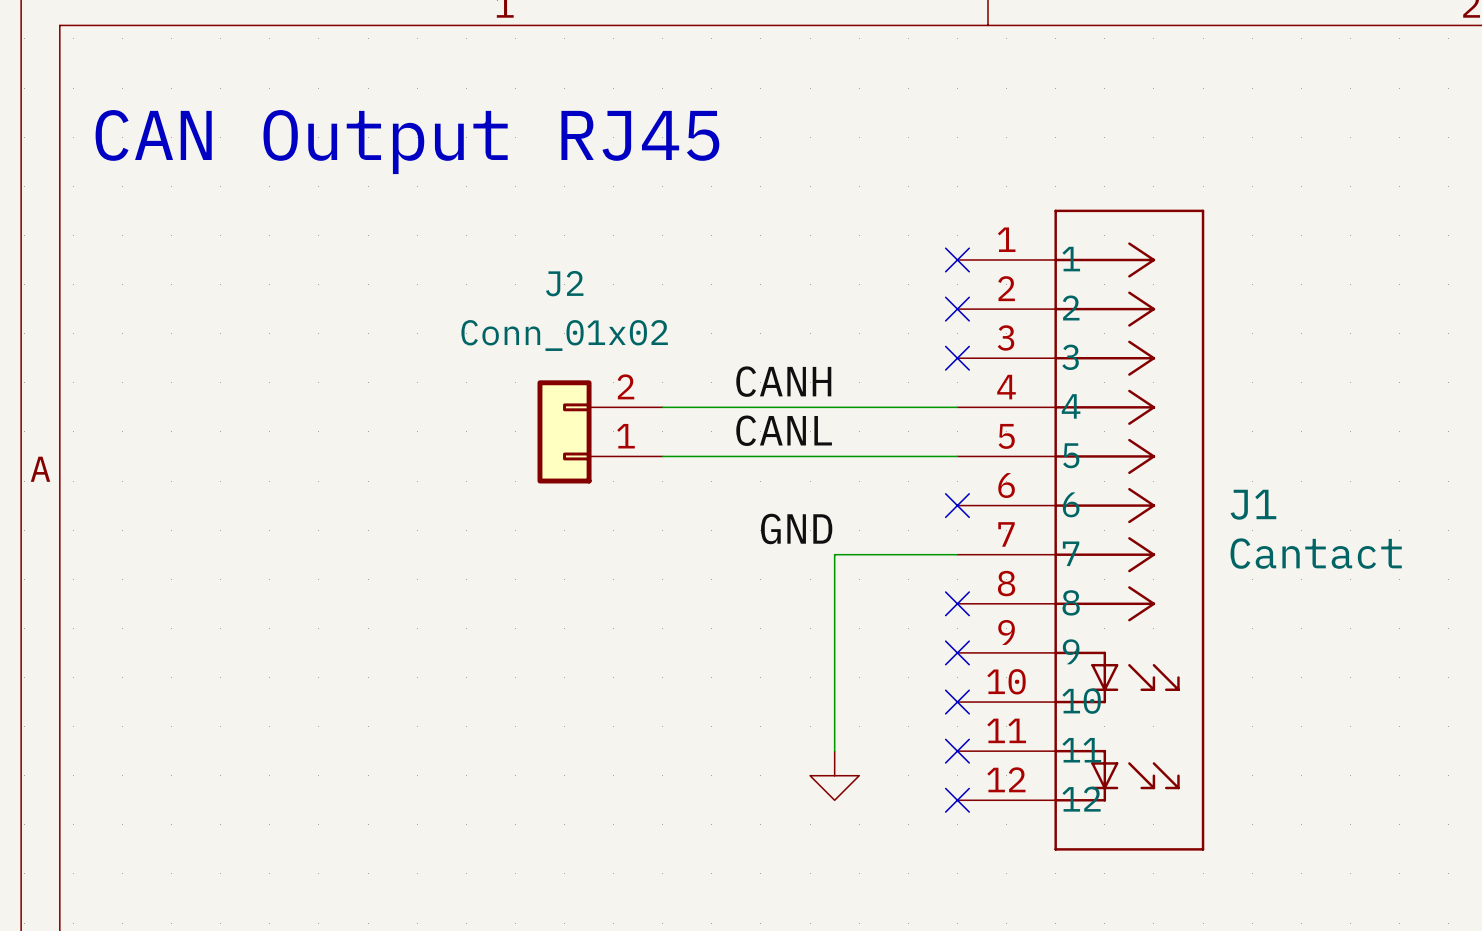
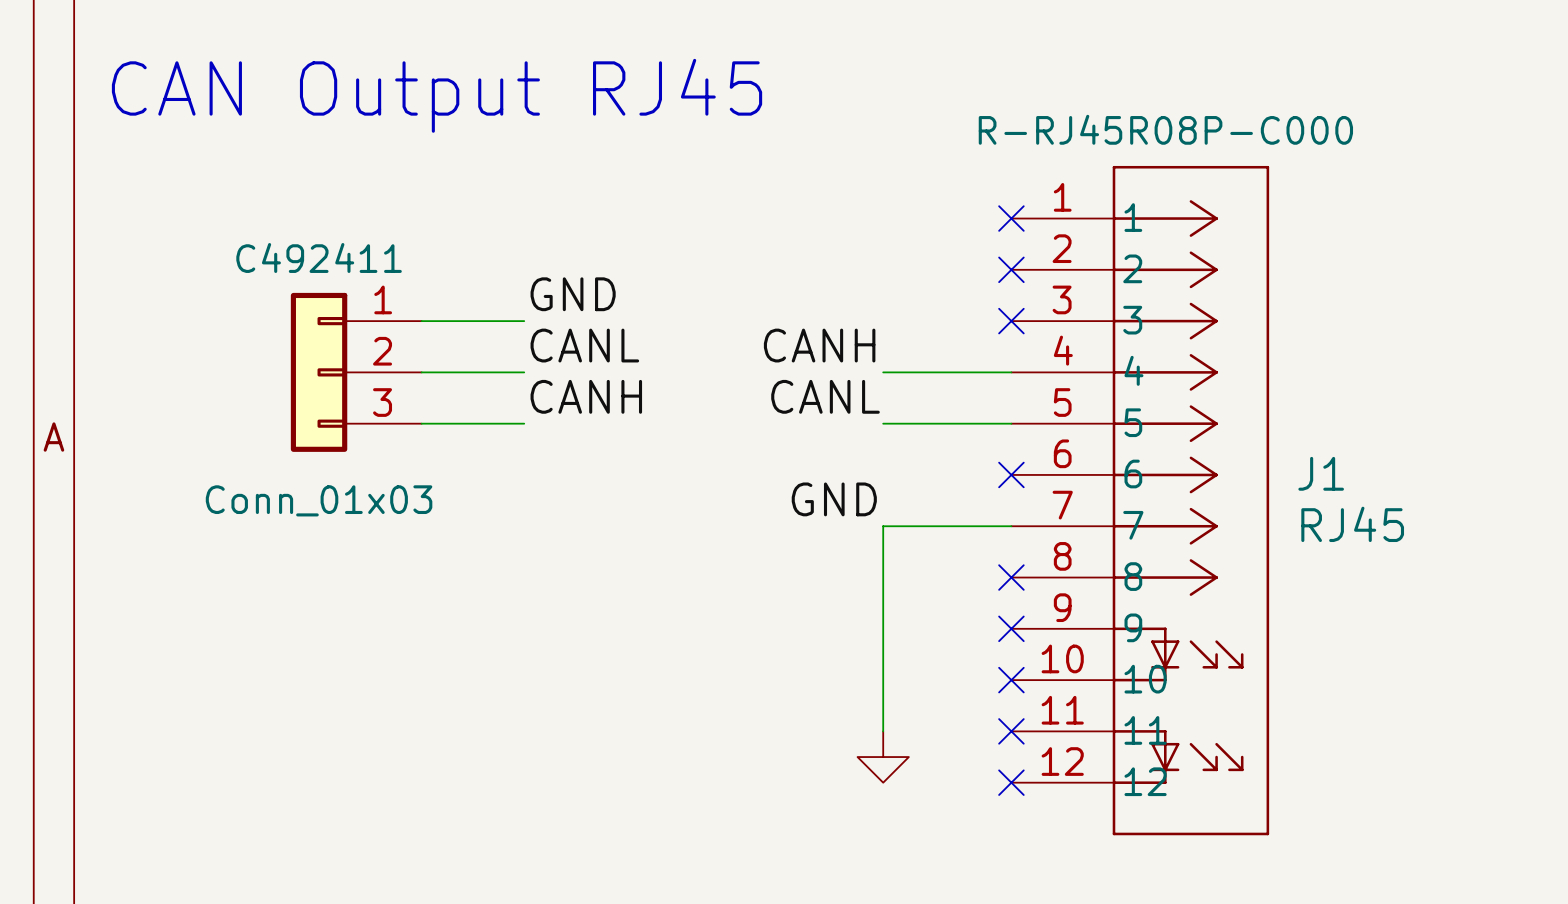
J1 text: none -> R-RJ45R08P-C000 (1165, 129)
label: none -> GND (573, 294)
wire: none -> (421, 321) (524, 321)
label: none -> CANL (584, 345)
part: none -> Conn_01x03 (356, 372)
wire: none -> (421, 372) (524, 372)
wire: (662, 407) (834, 407) -> none
label: none -> CANH (586, 396)
J2: Conn_01x02 (600, 431) -> none
wire: none -> (421, 423) (524, 423)
wire: (662, 456) (834, 456) -> none
J1 value: Cantact (1316, 553) -> RJ45 (1352, 524)

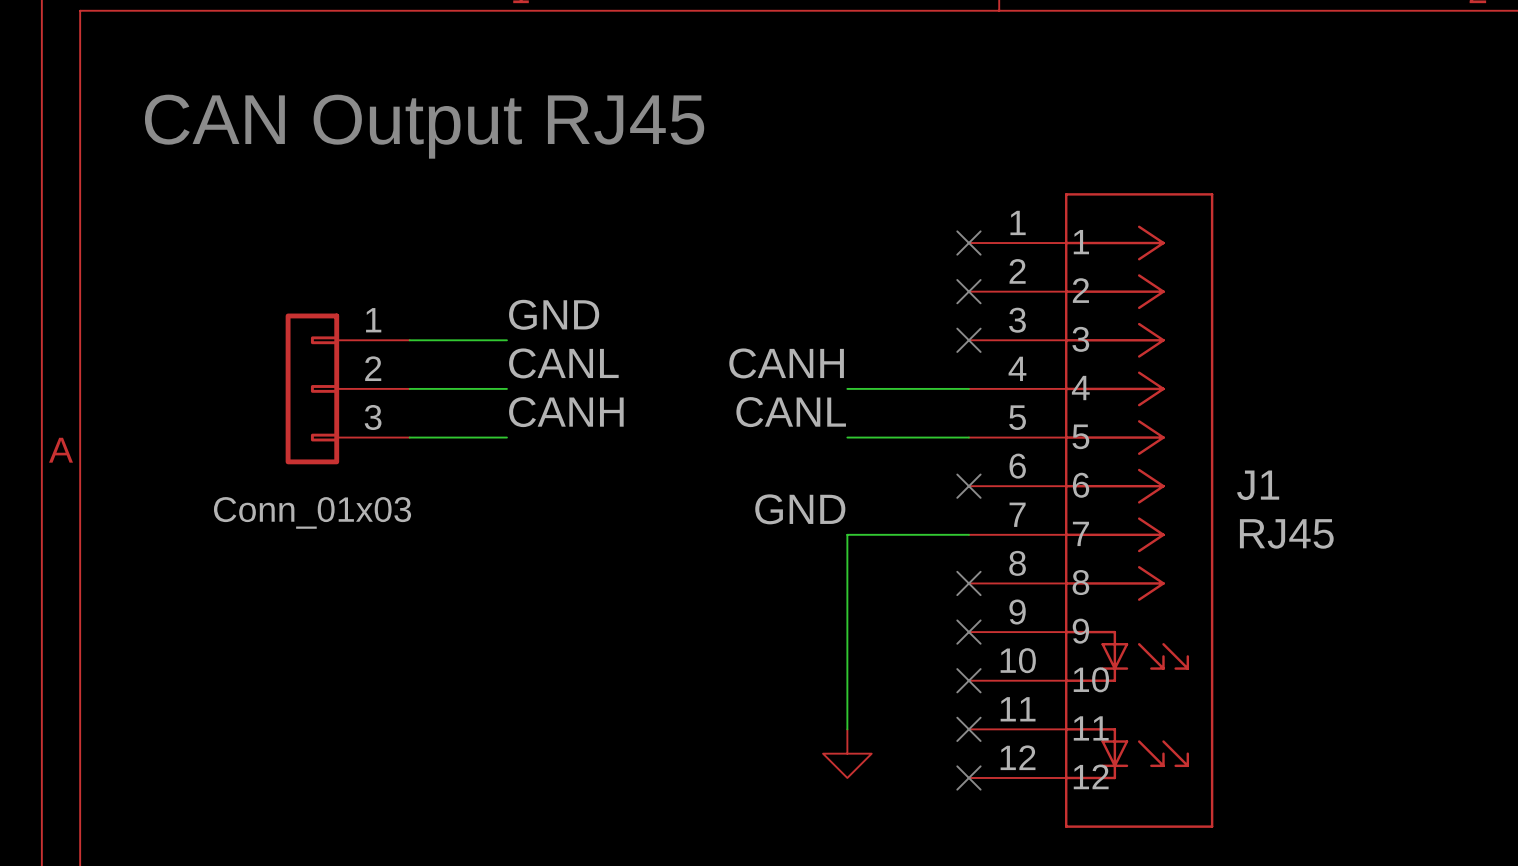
J1 text: R-RJ45R08P-C000 (1165, 129) -> none
part text: C492411 (319, 257) -> none

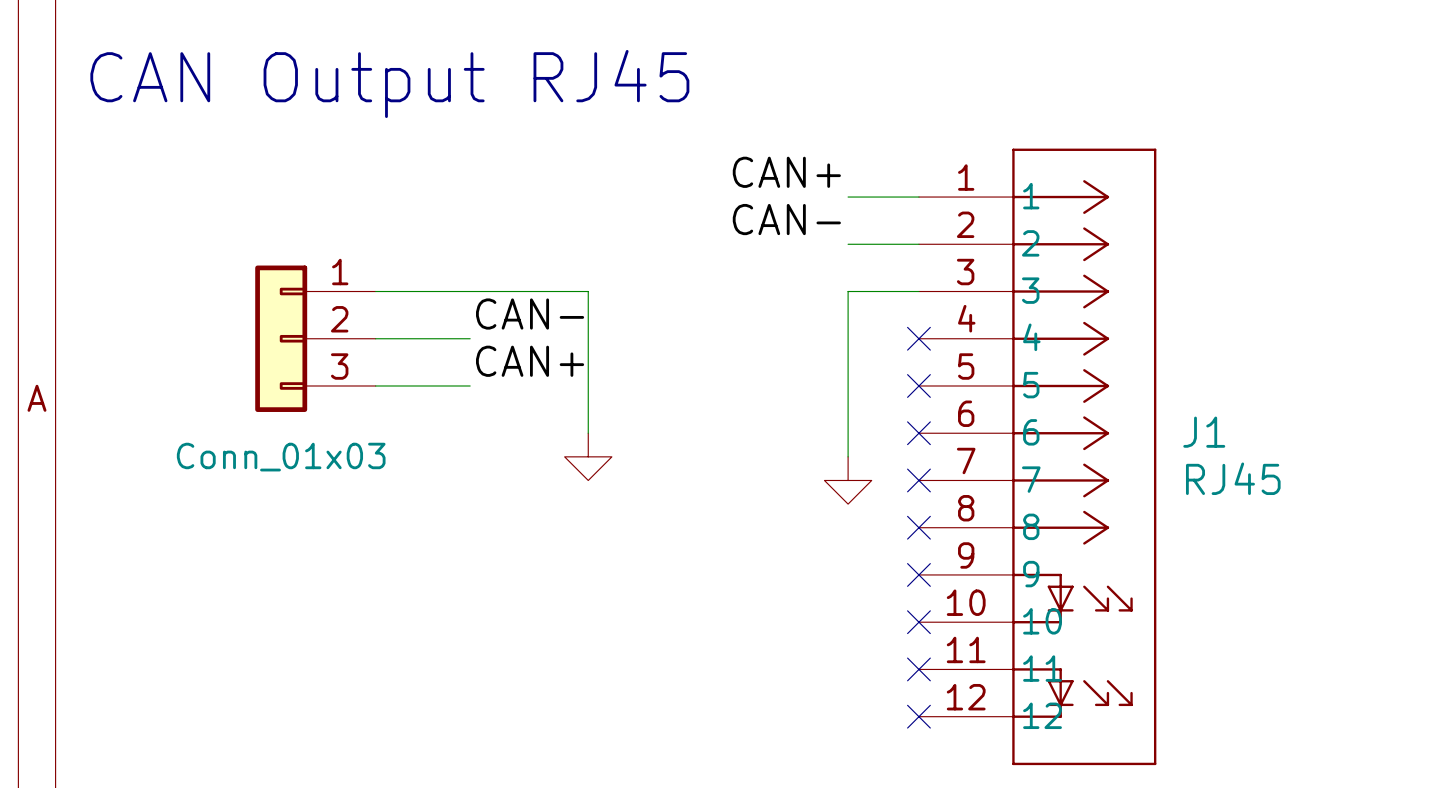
label: none -> CAN+ (786, 172)
wire: none -> (848, 197) (918, 197)
no-connect mark: (968, 243) -> none
label: none -> CAN- (786, 219)
wire: none -> (848, 244) (918, 244)
no-connect mark: (968, 291) -> none
label: GND (554, 314) -> none
wire: none -> (470, 291) (588, 291) (588, 433)
wire: none -> (918, 291) (848, 291) (848, 456)
no-connect mark: (968, 340) -> none
label: CANL (563, 363) -> CAN- (530, 314)
label: CANH (786, 363) -> none
wire: (847, 388) (968, 388) -> none
no-connect mark: none -> (918, 338)
label: CANH (566, 412) -> CAN+ (530, 361)
label: CANL (791, 412) -> none
wire: (847, 437) (968, 437) -> none
no-connect mark: none -> (918, 385)
label: GND (800, 509) -> none
power symbol: none -> (588, 456)
power symbol: none -> (848, 480)
wire: (968, 534) (847, 534) (847, 729) -> none
no-connect mark: none -> (918, 480)
power symbol: (847, 753) -> none

